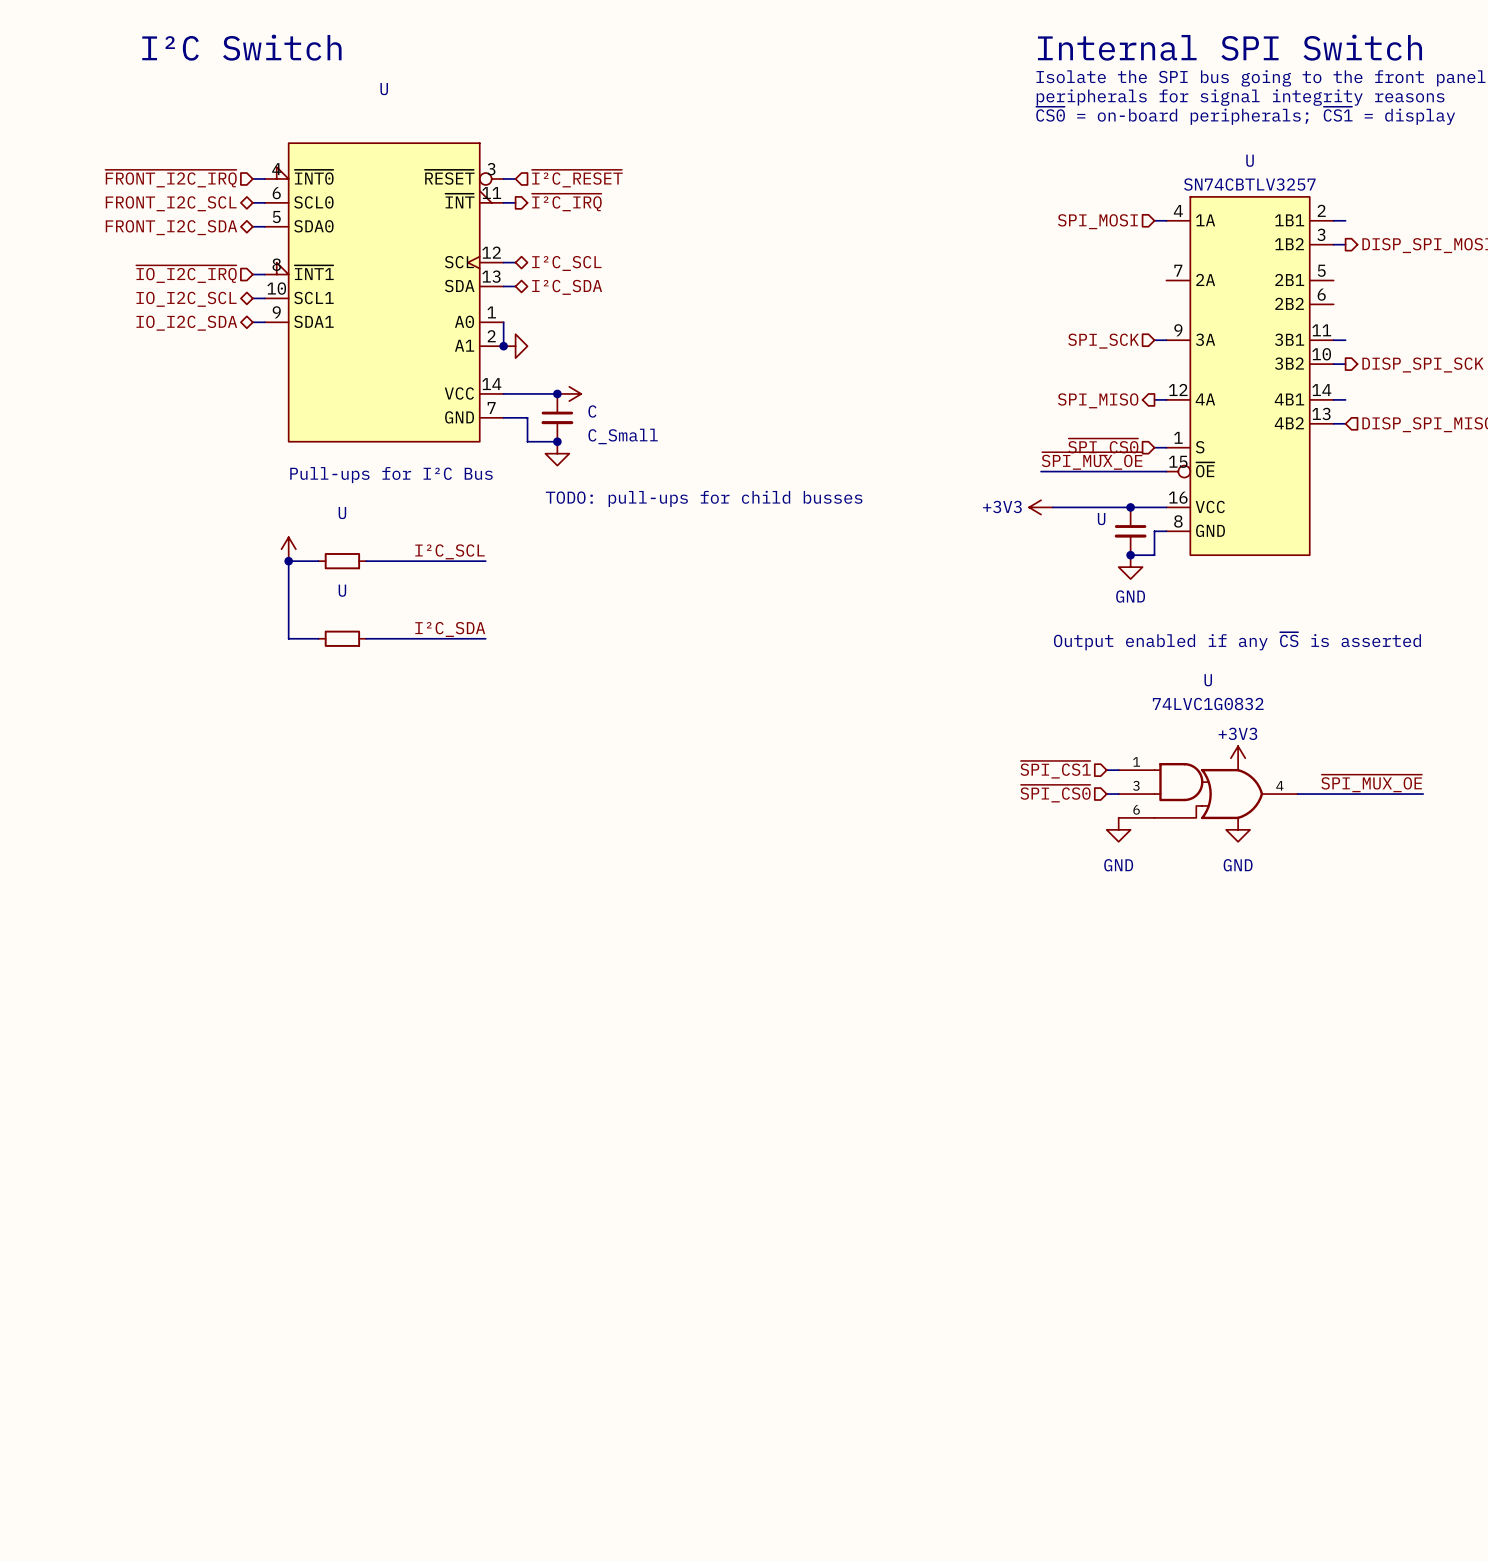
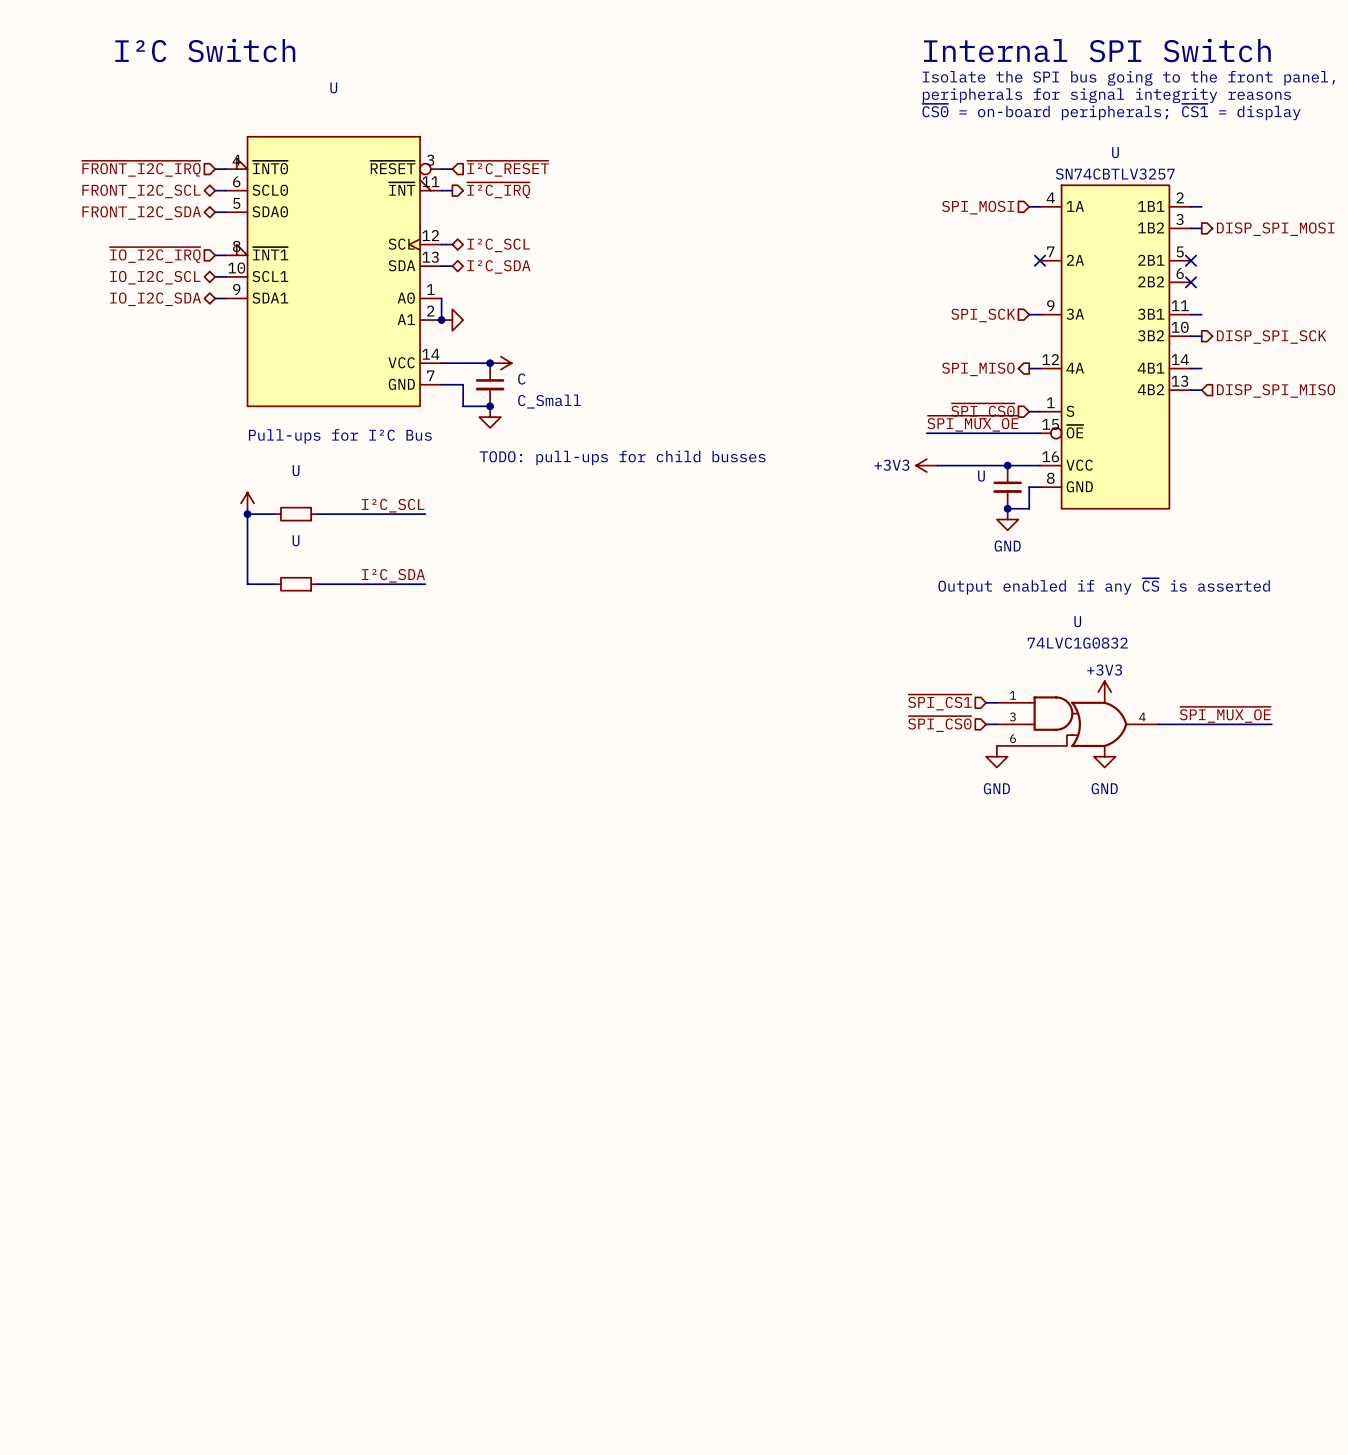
no-connect mark: none -> (1040, 260)
no-connect mark: none -> (1190, 260)
no-connect mark: none -> (1190, 282)

